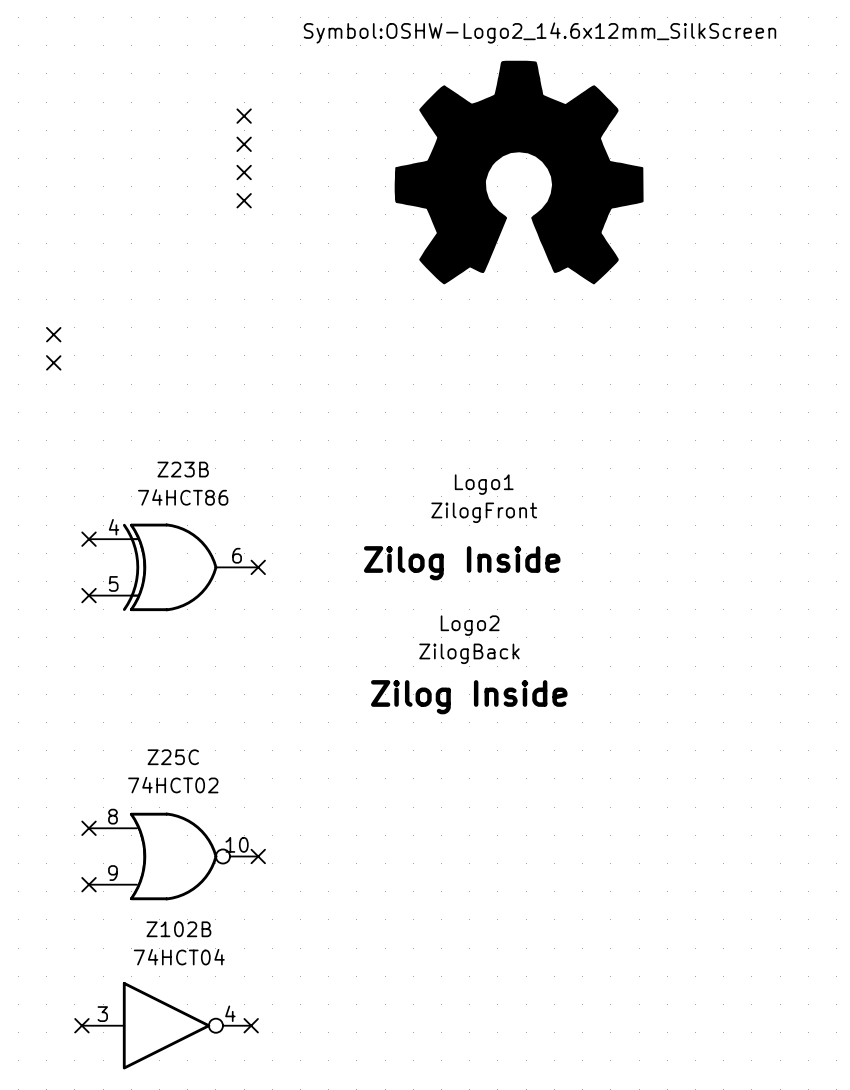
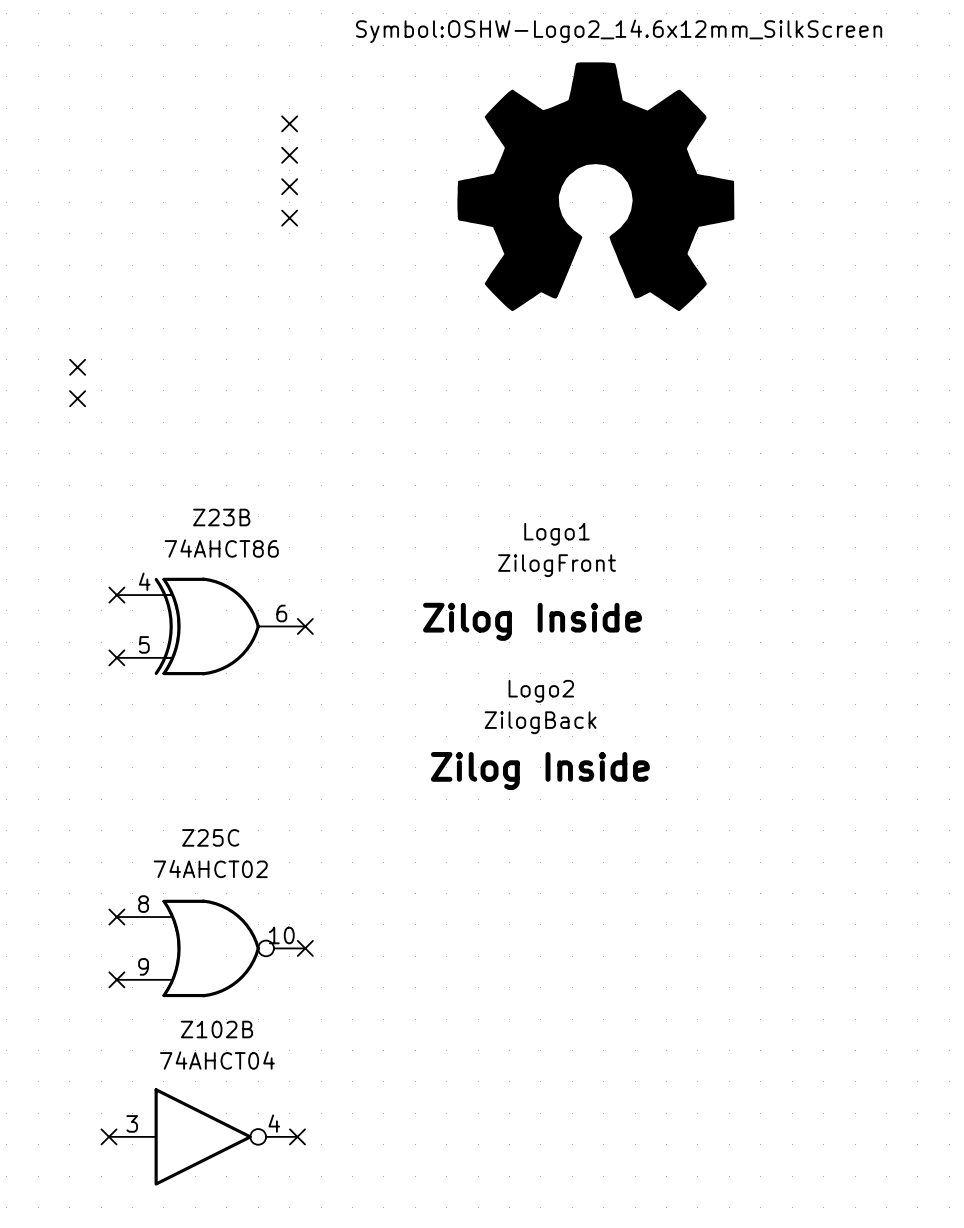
Z23B value: 74HCT86 (183, 497) -> 74AHCT86 (221, 548)
Z25C value: 74HCT02 (173, 785) -> 74AHCT02 (210, 868)
Z102B value: 74HCT04 (179, 957) -> 74AHCT04 (217, 1060)

